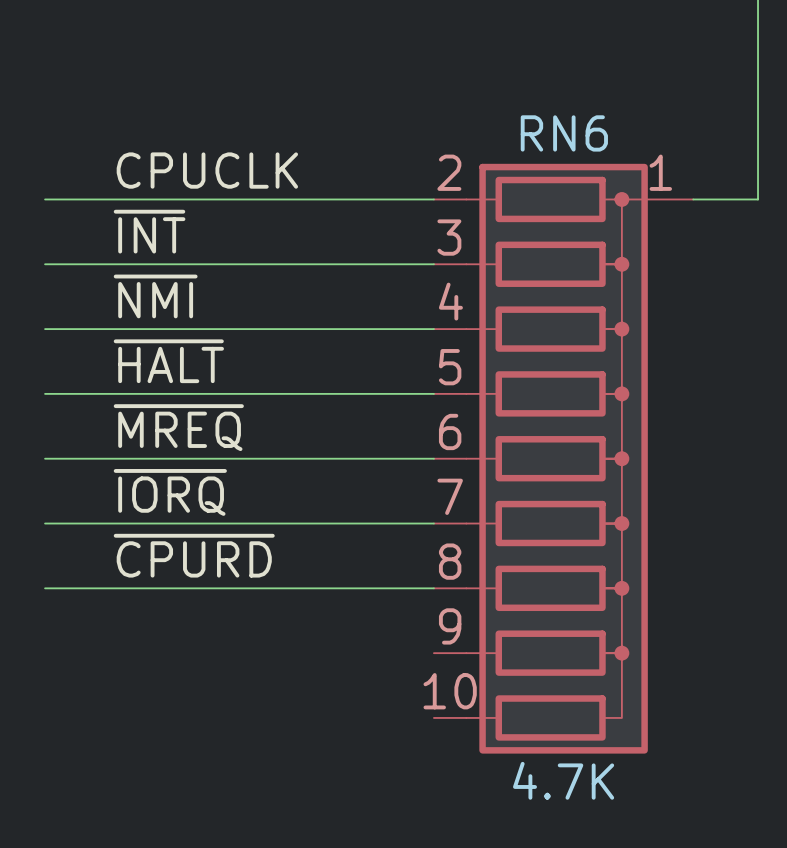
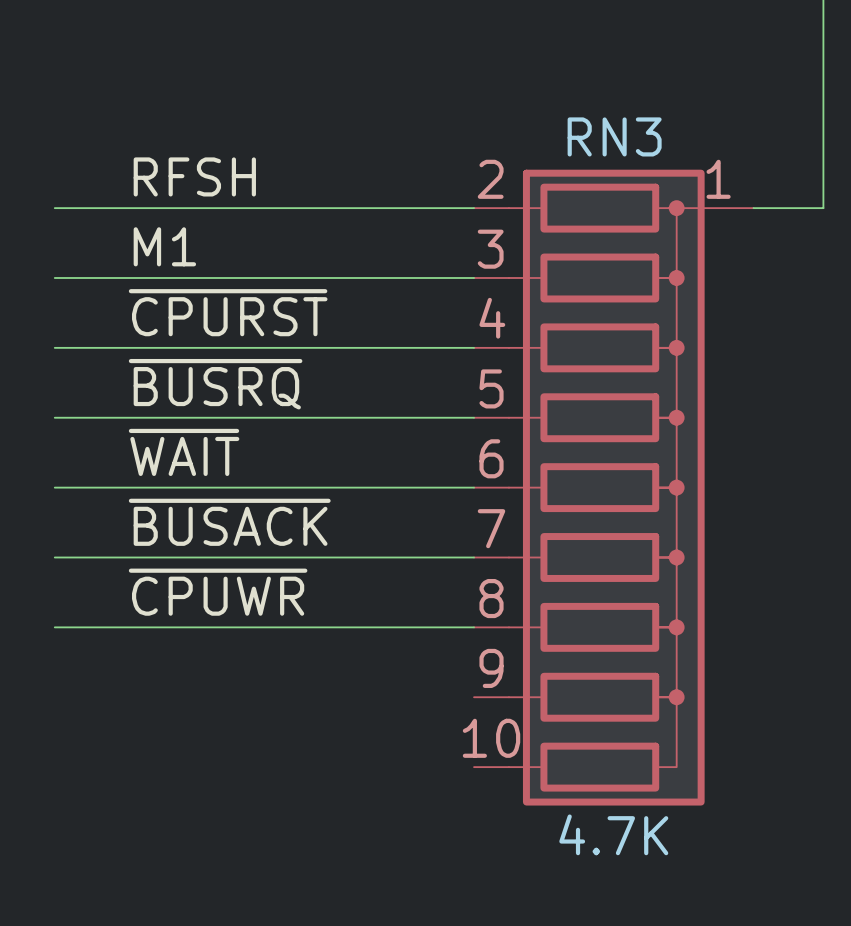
RN6 name: RN6 (564, 133) -> RN3 (614, 136)
label: CPUCLK (207, 170) -> RFSH (194, 176)
label: ~{INT} (149, 231) -> M1 (164, 246)
label: ~{NMI} (155, 296) -> ~{CPURST} (228, 312)
label: ~{HALT} (168, 361) -> ~{BUSRQ} (215, 384)
label: ~{MREQ} (178, 427) -> ~{WAIT} (184, 452)
label: ~{IORQ} (170, 492) -> ~{BUSACK} (229, 522)
label: ~{CPURD} (194, 555) -> ~{CPUWR} (218, 592)

